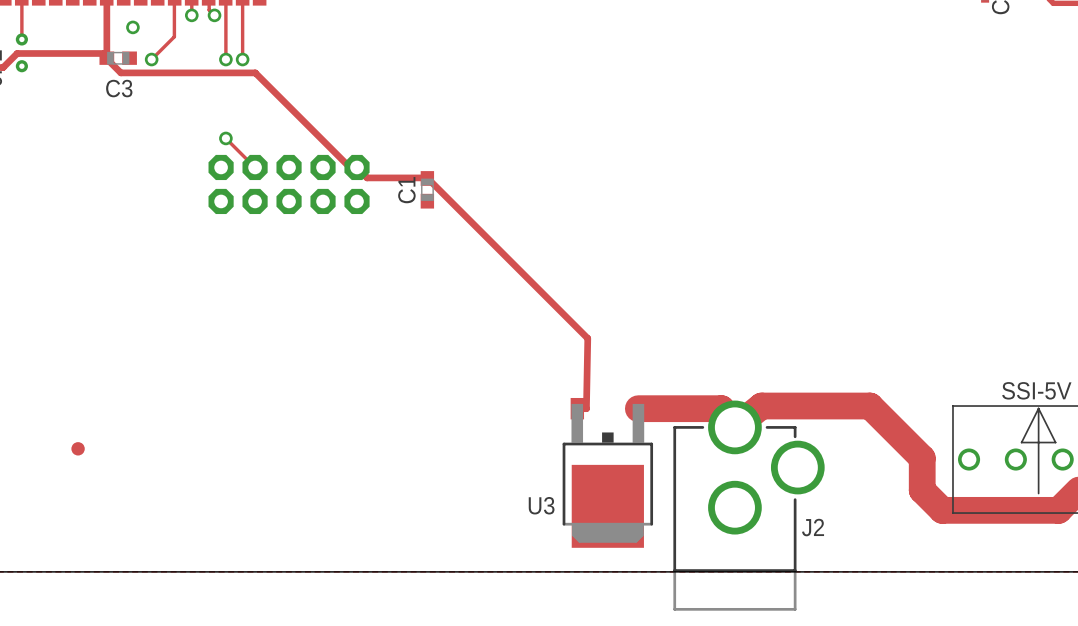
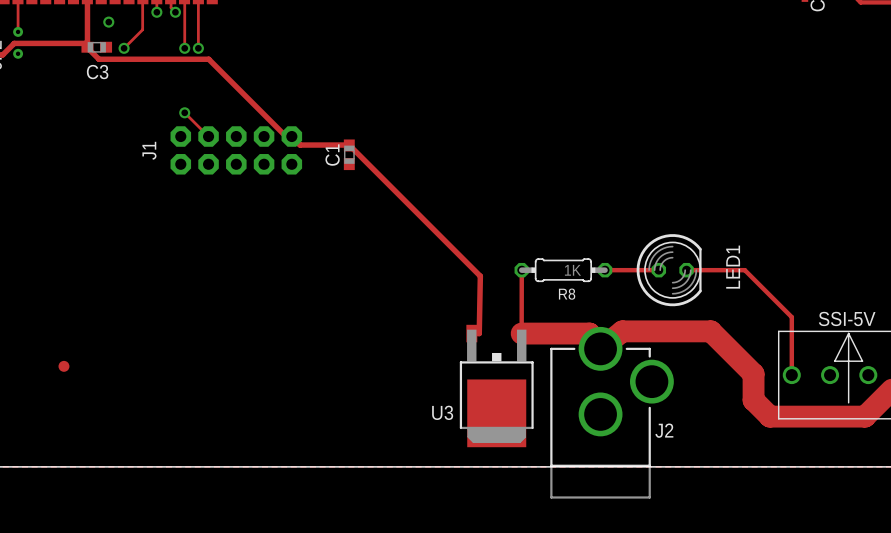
J1 name: none -> J1 (149, 150)
track: none -> (521, 270) (521, 333)
R8: none -> 1K (563, 270)
track: none -> (605, 270) (658, 270)
LED1: none -> (669, 270)
track: none -> (686, 270) (744, 270) (791, 317) (791, 375)

